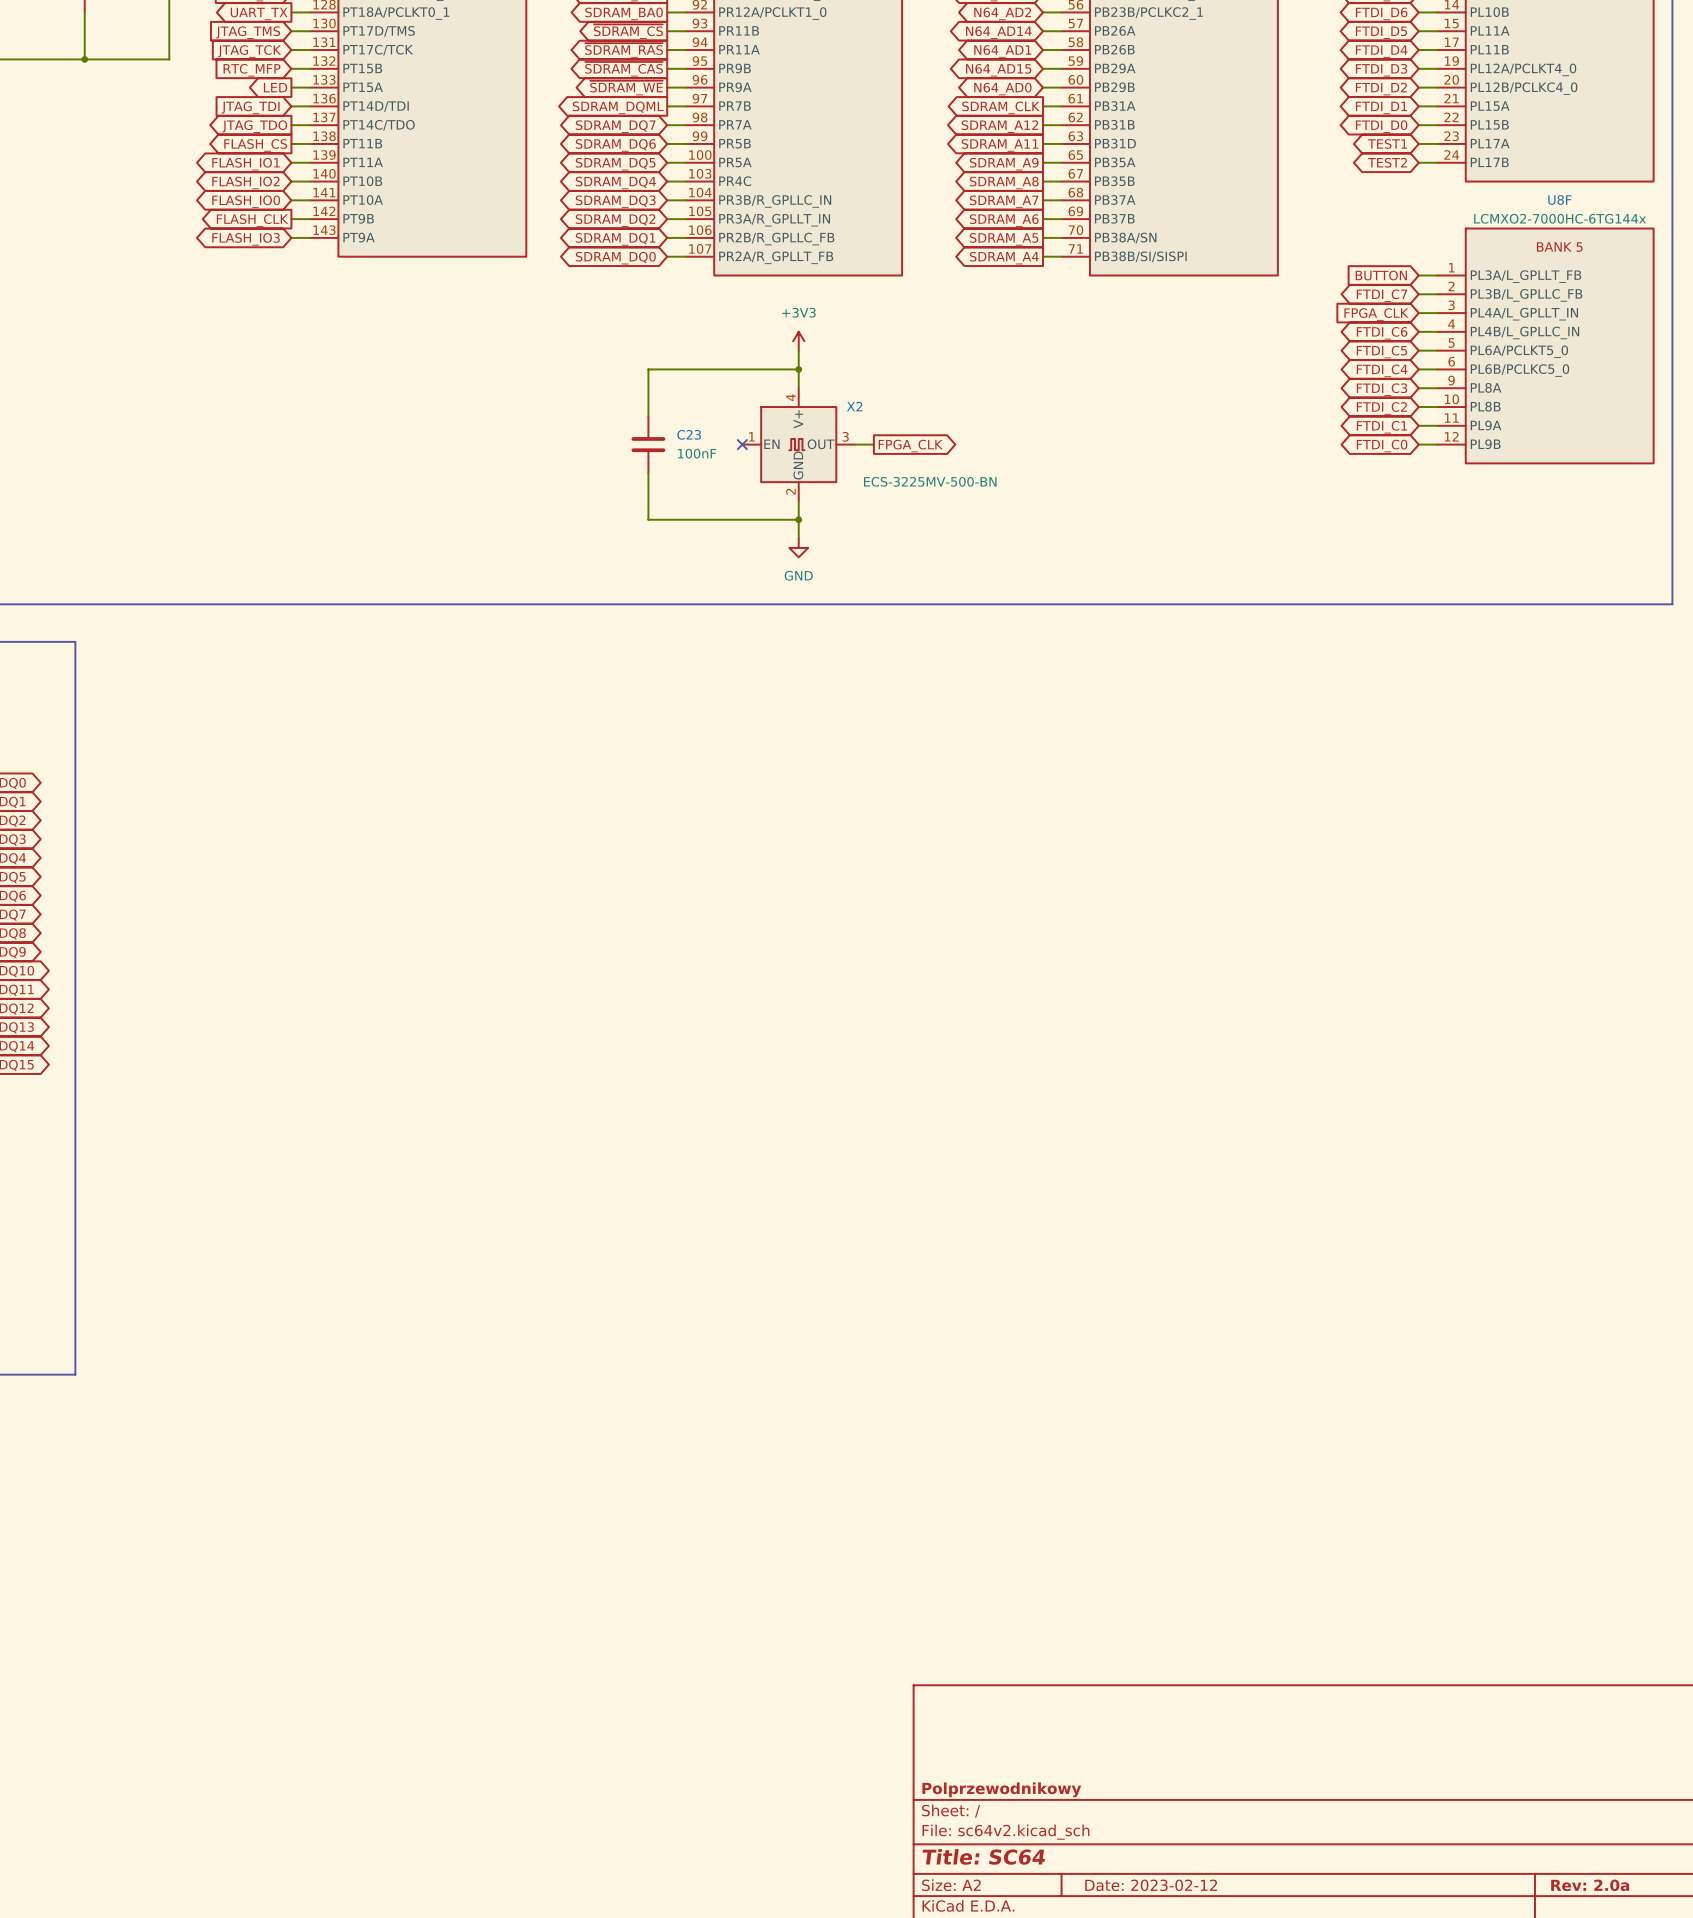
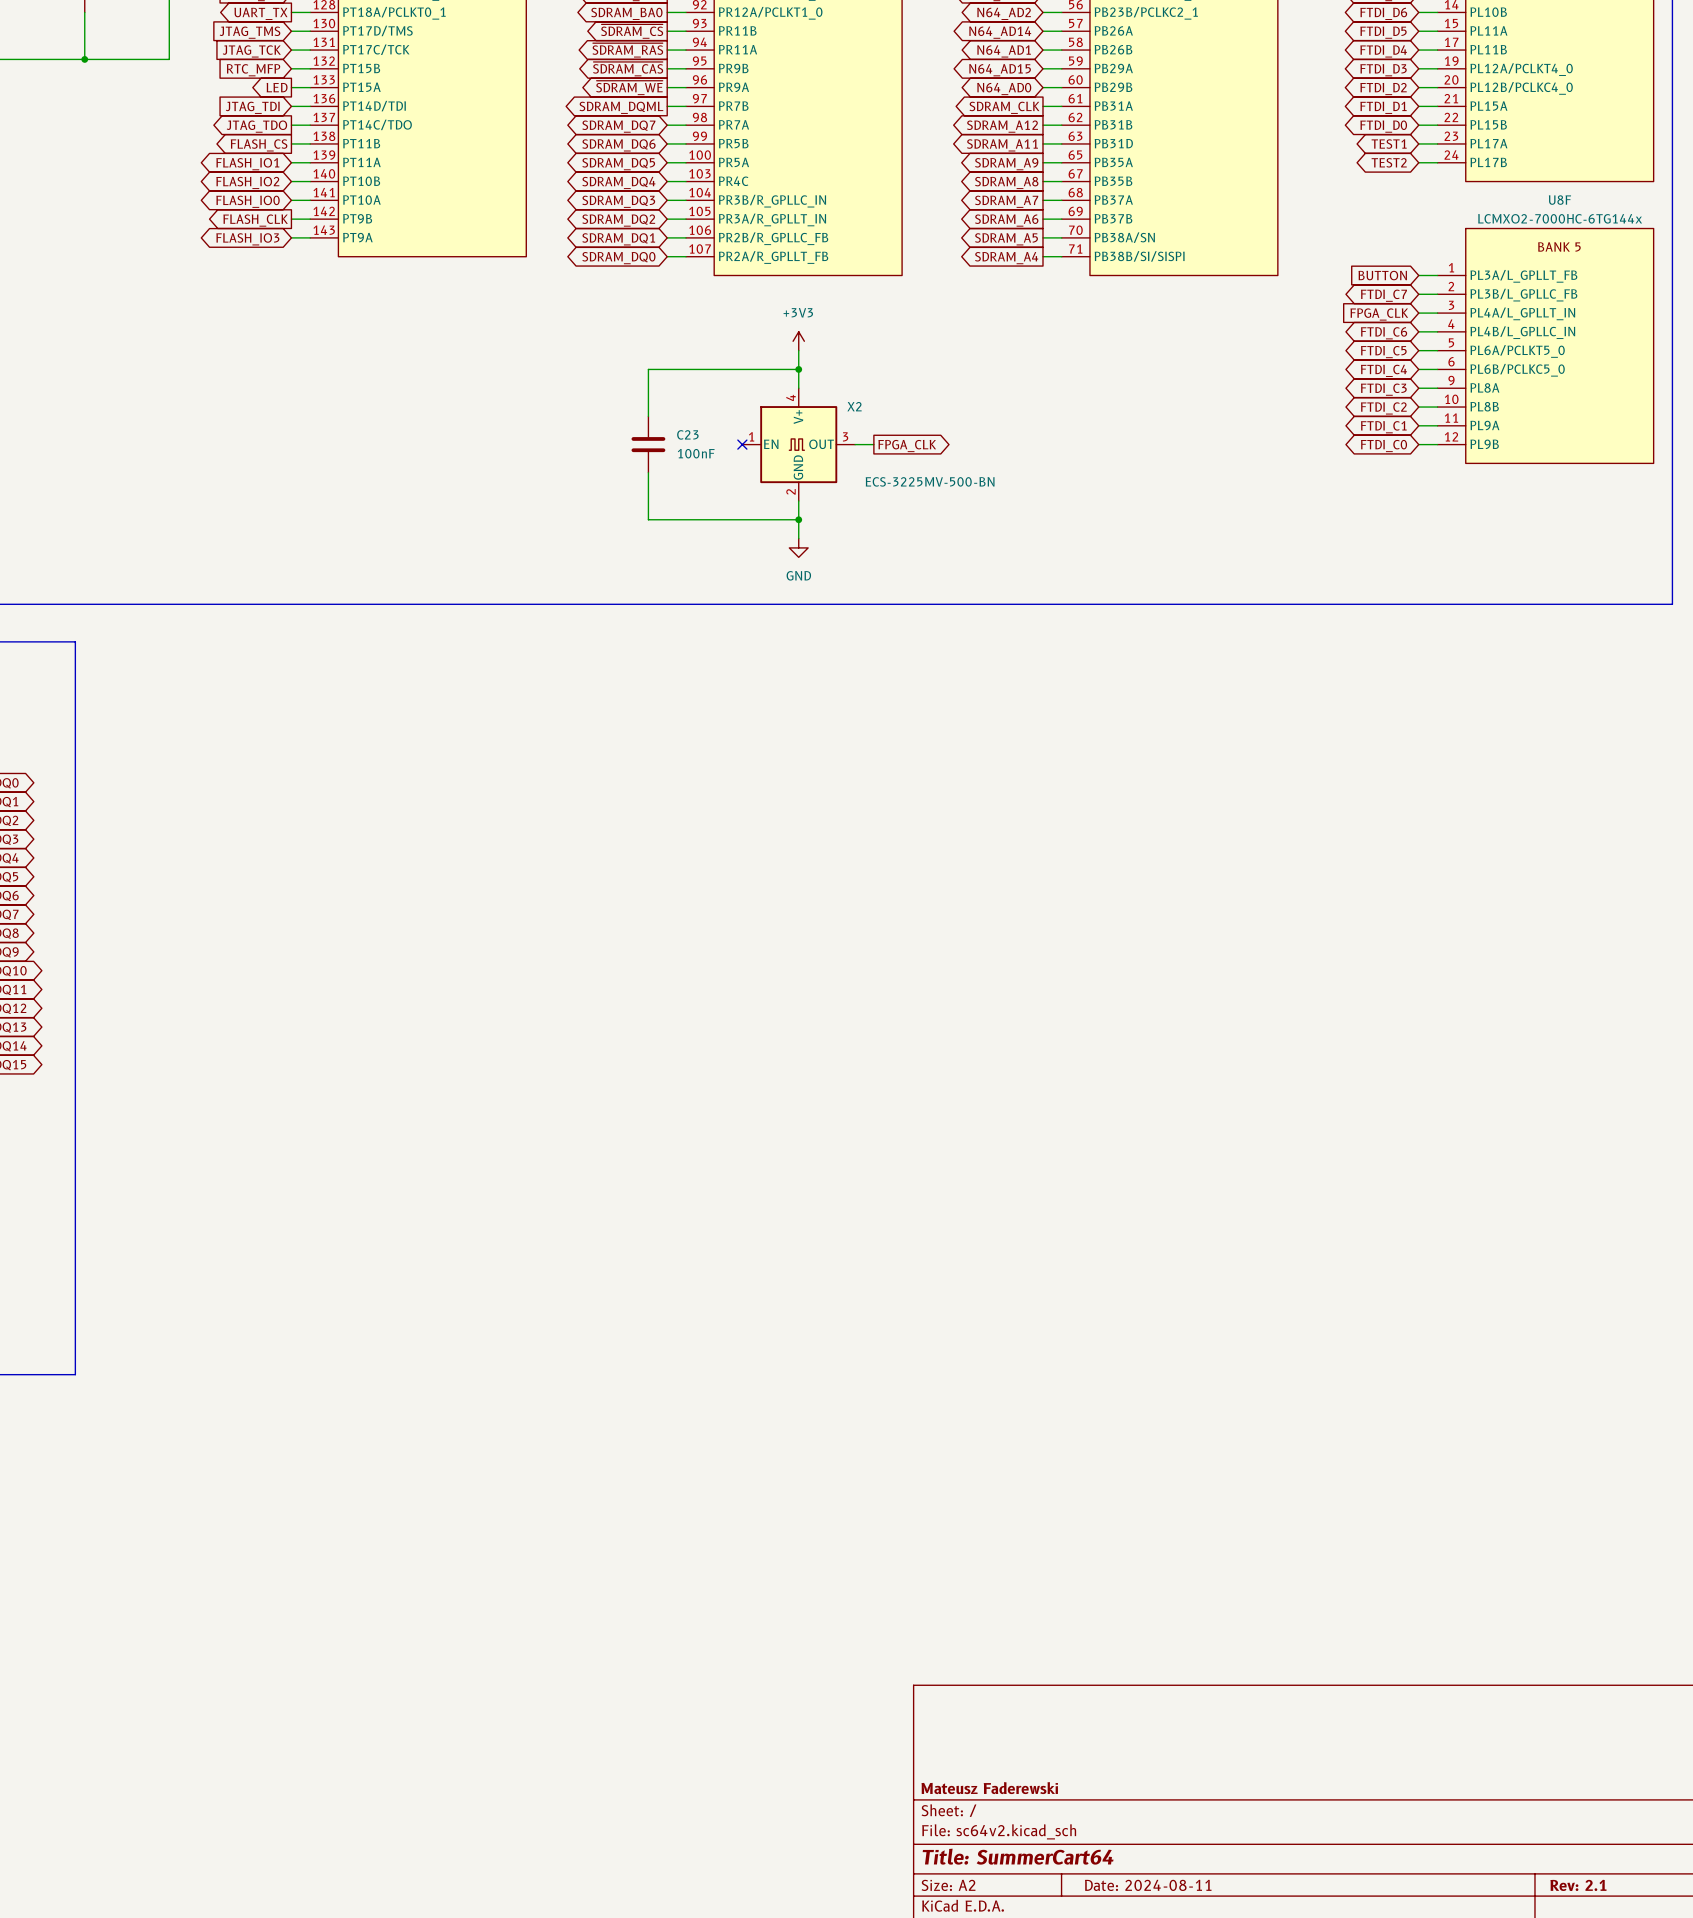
title block: Polprzewodnikowy (1001, 1789) -> Mateusz Faderewski (989, 1788)
title block: Title: SC64 (983, 1856) -> Title: SummerCart64 (1018, 1856)
title block: Date: 2023-02-12 (1151, 1885) -> Date: 2024-08-11 (1148, 1885)
title block: Rev: 2.0a (1590, 1885) -> Rev: 2.1 (1578, 1885)

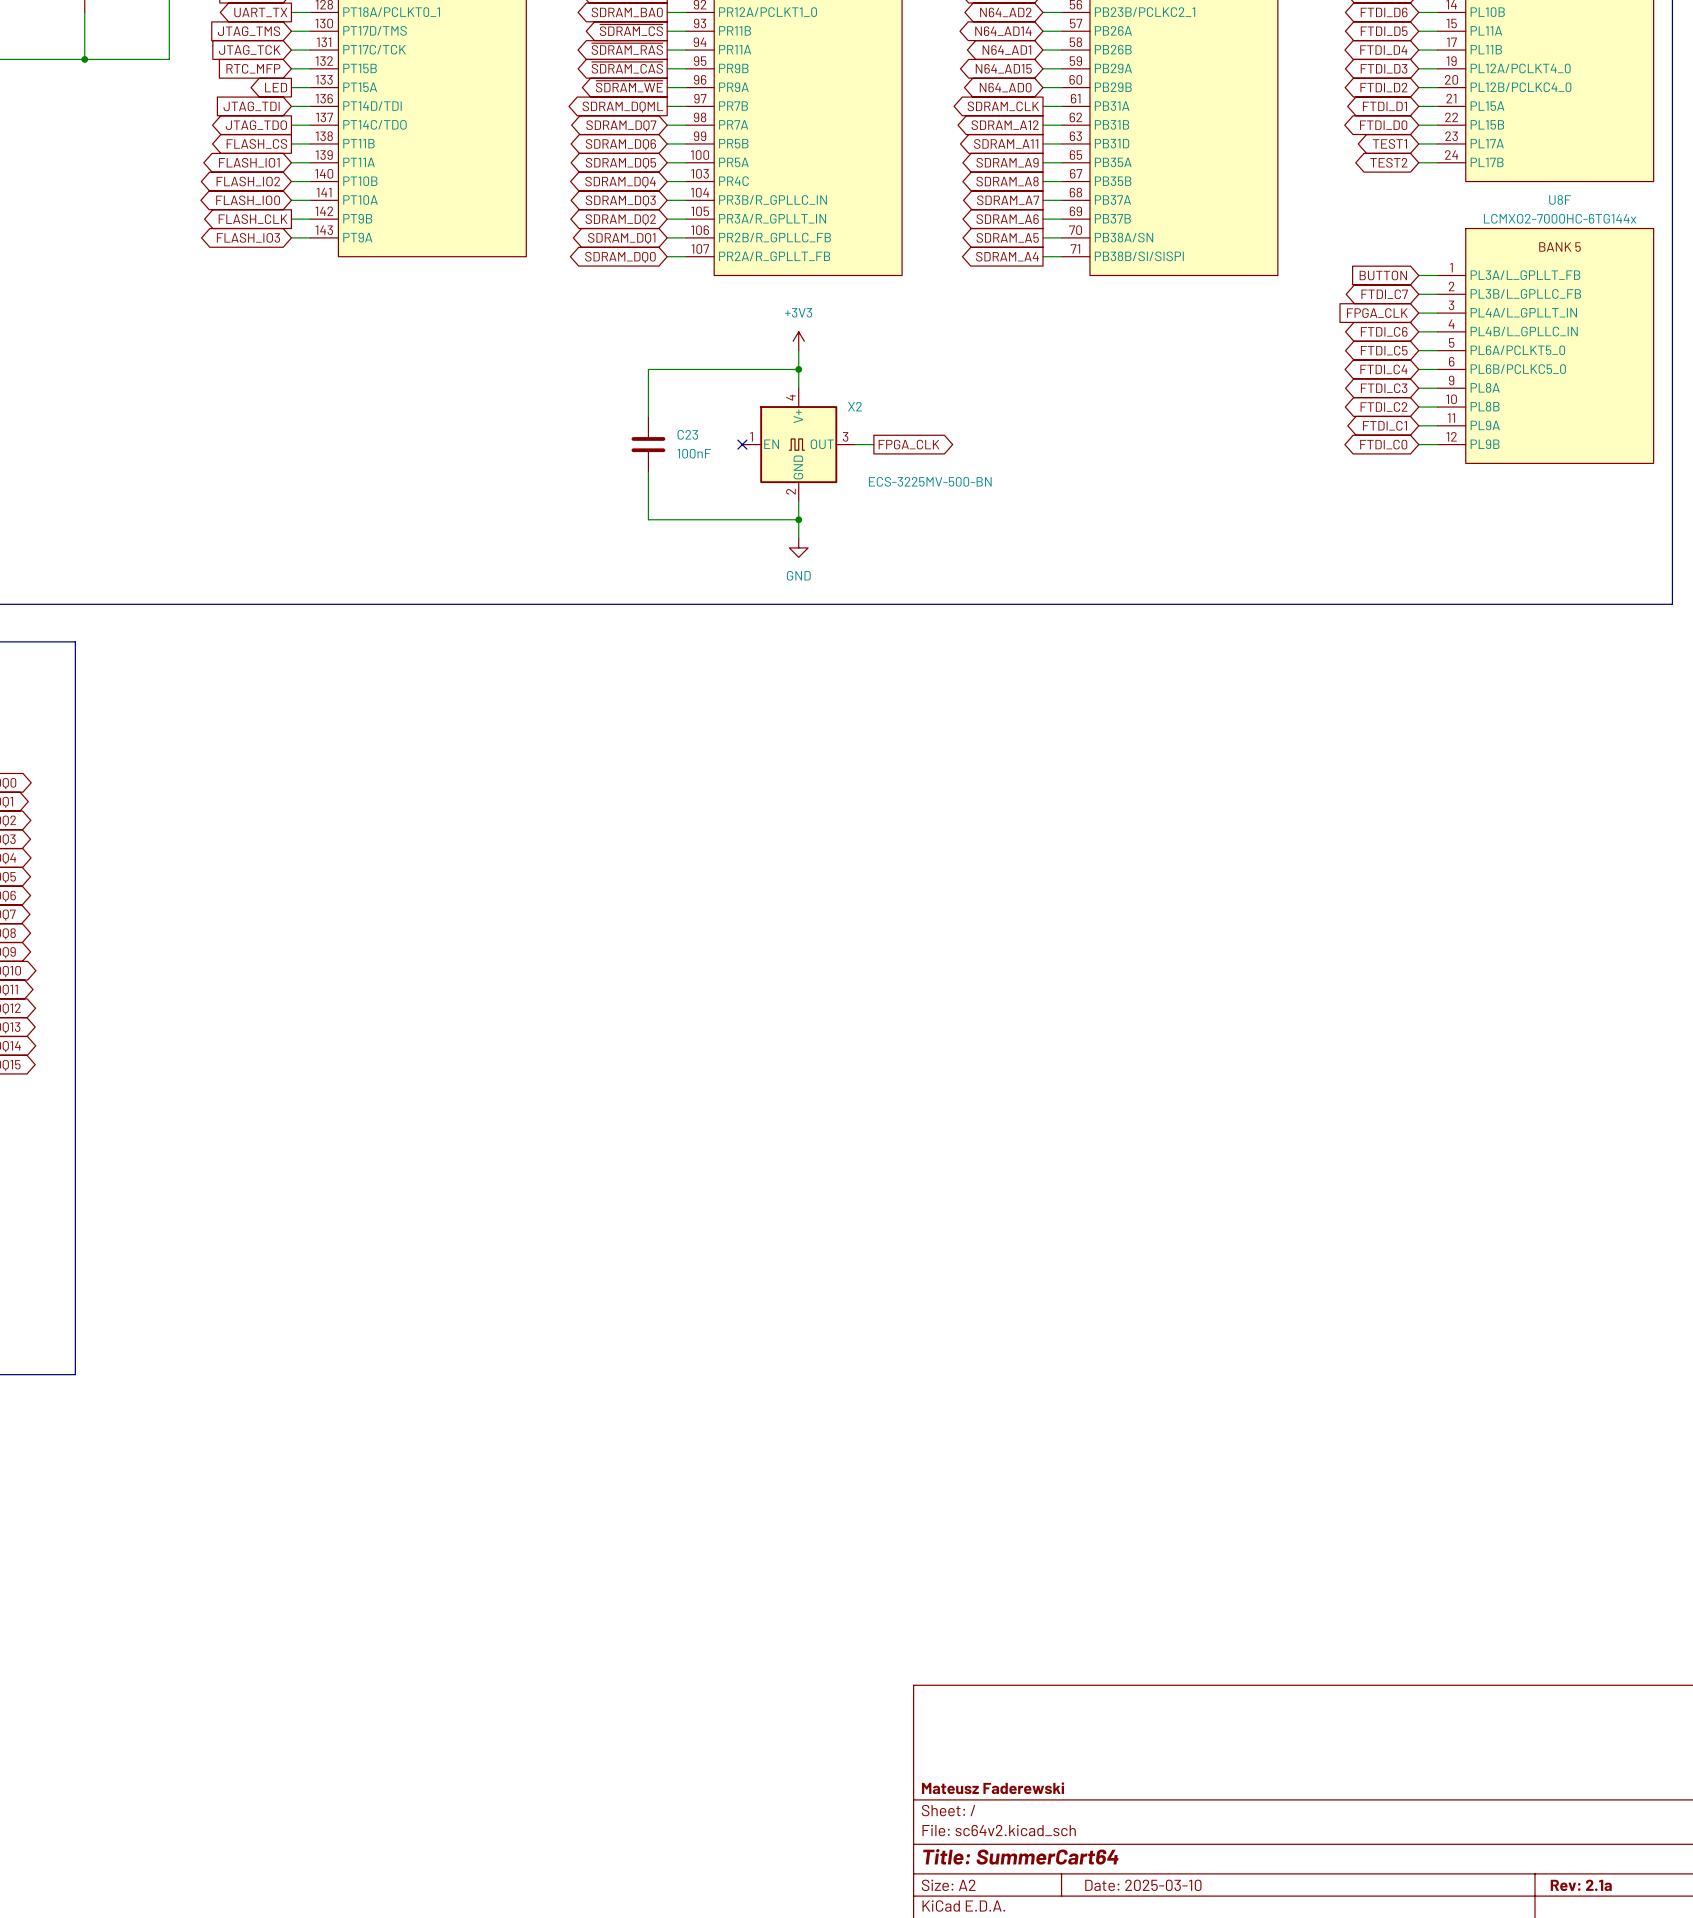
title block: Date: 2024-08-11 (1148, 1885) -> Date: 2025-03-10 (1143, 1885)
title block: Rev: 2.1 (1578, 1885) -> Rev: 2.1a (1581, 1885)

